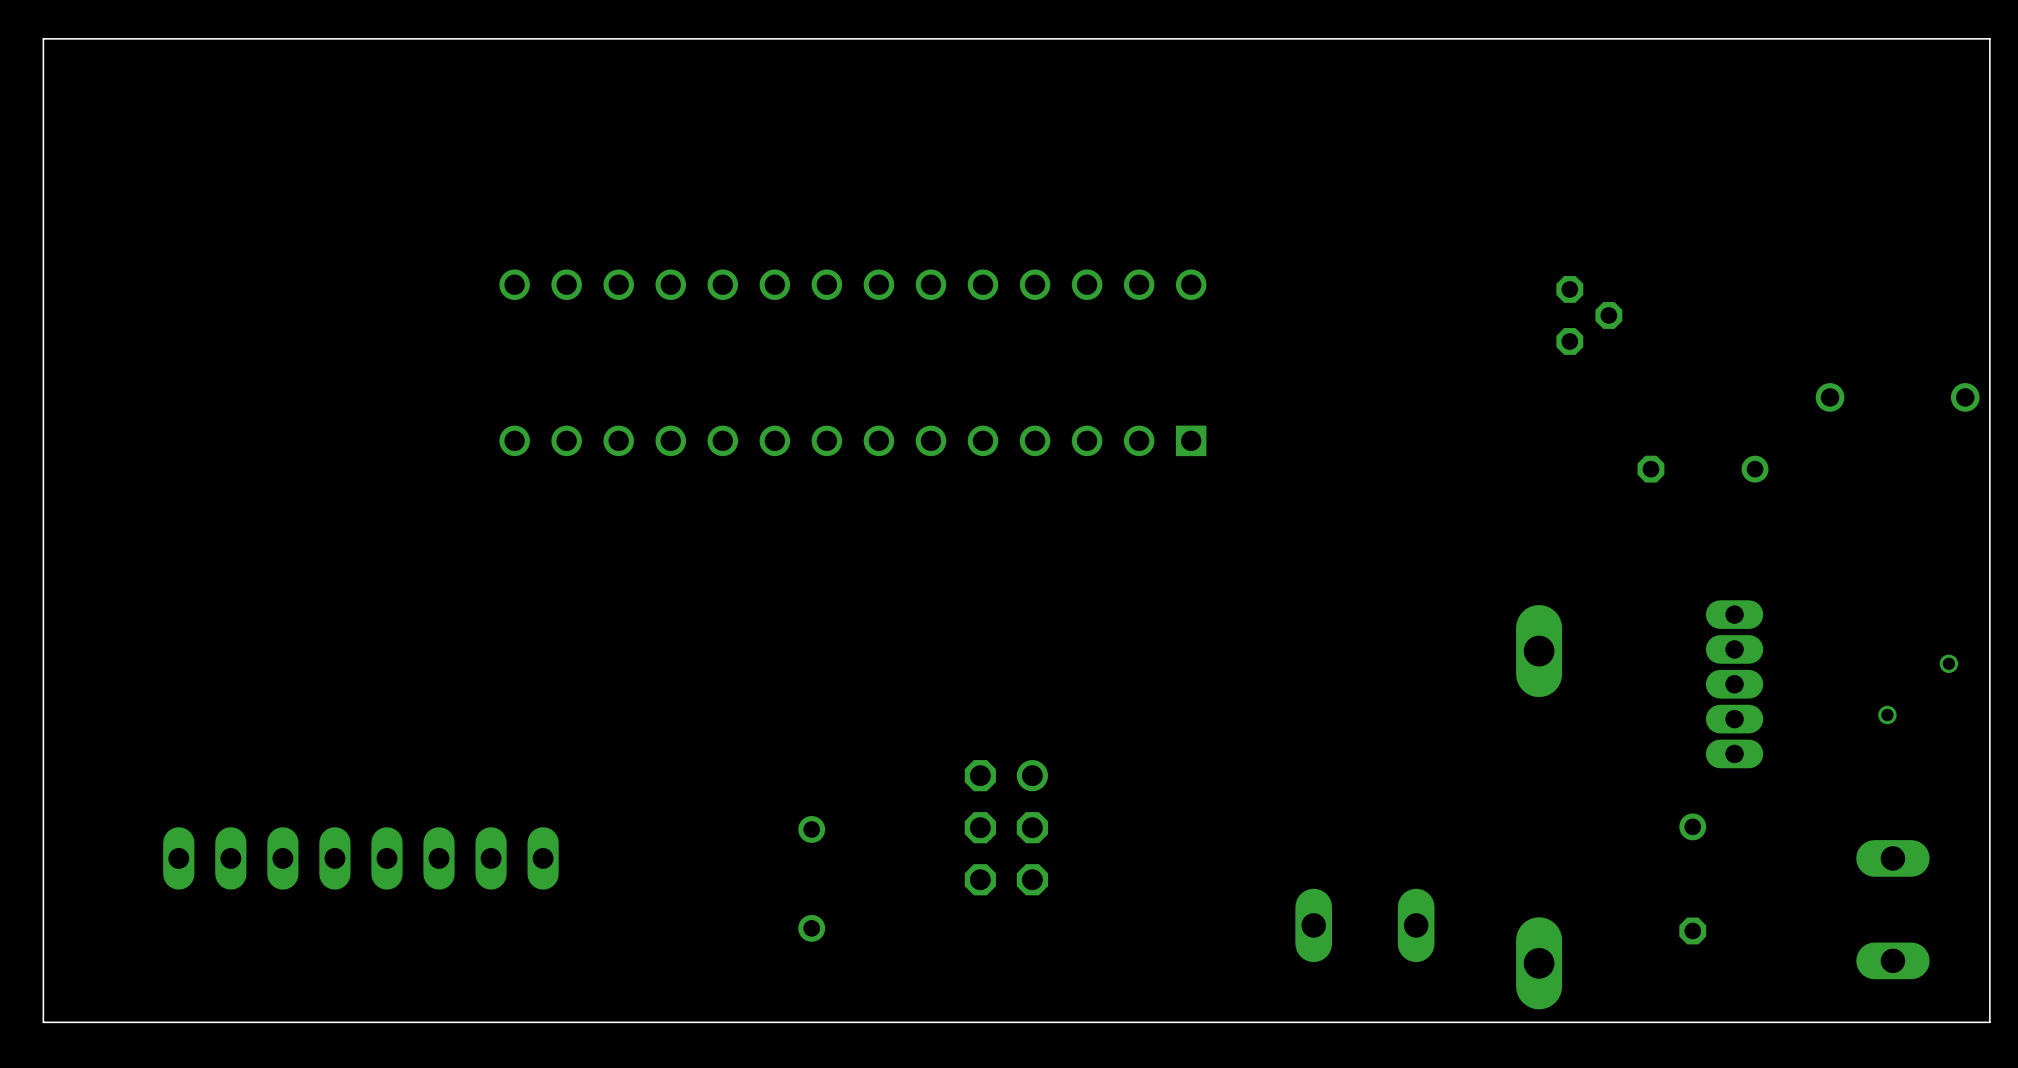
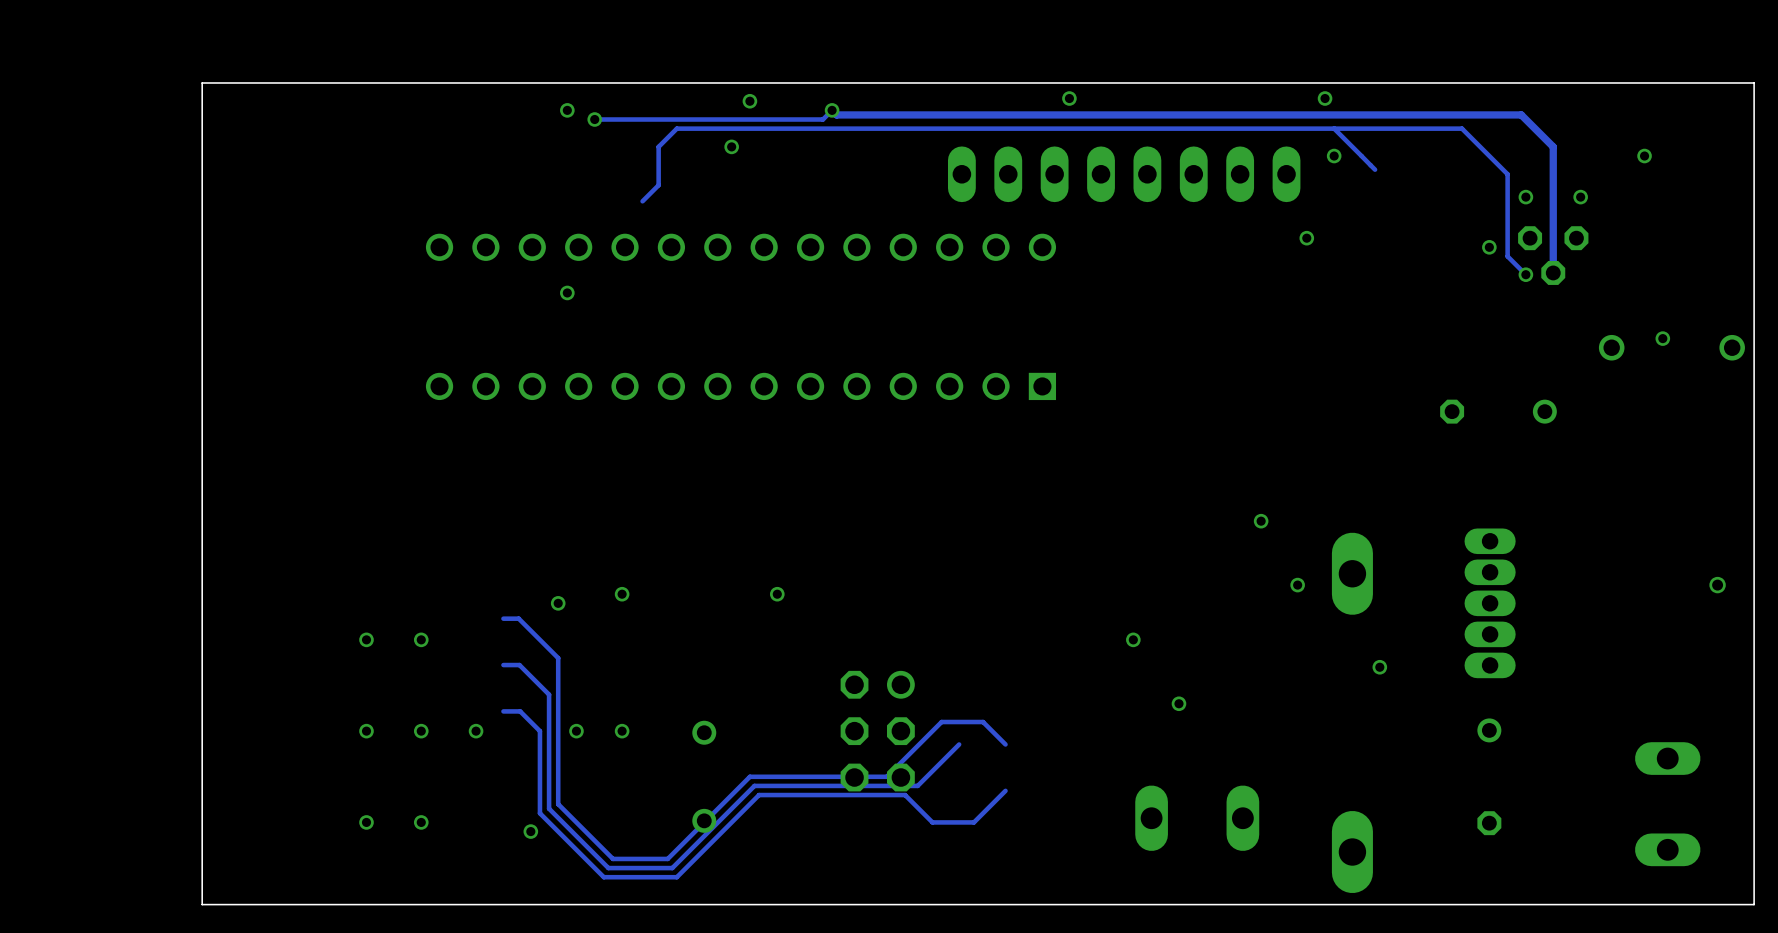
board edge: (1989, 100) (1989, 38) (43, 38) (43, 1022) (248, 1022) -> (1754, 82) (202, 82) (202, 904)
via: none -> (1069, 98)
via: none -> (1325, 98)
via: none -> (749, 101)
via: none -> (567, 110)
via: none -> (832, 110)
track: none -> (594, 119) (822, 119) (832, 110) (836, 114) (1521, 114) (1553, 146) (1553, 272)
via: none -> (594, 119)
track: none -> (1334, 128) (1375, 169)
via: none -> (731, 146)
via: none -> (1334, 156)
via: none -> (1644, 156)
part: none -> (1124, 174)
via: none -> (1525, 197)
via: none -> (1580, 197)
track: none -> (642, 201) (658, 185) (658, 146) (676, 128) (1461, 128) (1507, 174) (1507, 256) (1525, 274)
via: none -> (1306, 238)
via: none -> (1489, 247)
part rotation: 0° (1589, 315) -> 90° clockwise (1553, 255)
part position: (1589, 315) -> (1553, 255)
via: none -> (1525, 274)
via: none -> (567, 292)
via: none -> (1662, 338)
via: none -> (1261, 521)
via: none -> (1297, 585)
via: none -> (622, 594)
via: none -> (777, 594)
via: none -> (558, 603)
part position: (1734, 684) -> (1490, 603)
track: none -> (503, 618) (518, 618) (558, 658) (558, 804) (612, 858) (667, 858) (749, 776) (886, 776) (941, 722) (983, 722) (1005, 744)
via: (1887, 715) -> none
via: none -> (366, 639)
via: none -> (421, 639)
via: none -> (1133, 639)
track: none -> (503, 665) (519, 665) (549, 694) (549, 808) (608, 868) (672, 868) (754, 785) (917, 785) (959, 744)
via: none -> (1379, 667)
via: none -> (1178, 703)
track: none -> (503, 711) (520, 711) (539, 731) (539, 813) (603, 877) (676, 877) (759, 795) (905, 795) (932, 822) (973, 822) (1005, 790)
via: none -> (366, 731)
via: none -> (421, 731)
via: none -> (476, 731)
via: none -> (576, 731)
via: none -> (622, 731)
part: (360, 858) -> none
via: none -> (366, 822)
via: none -> (421, 822)
via: none -> (530, 831)

